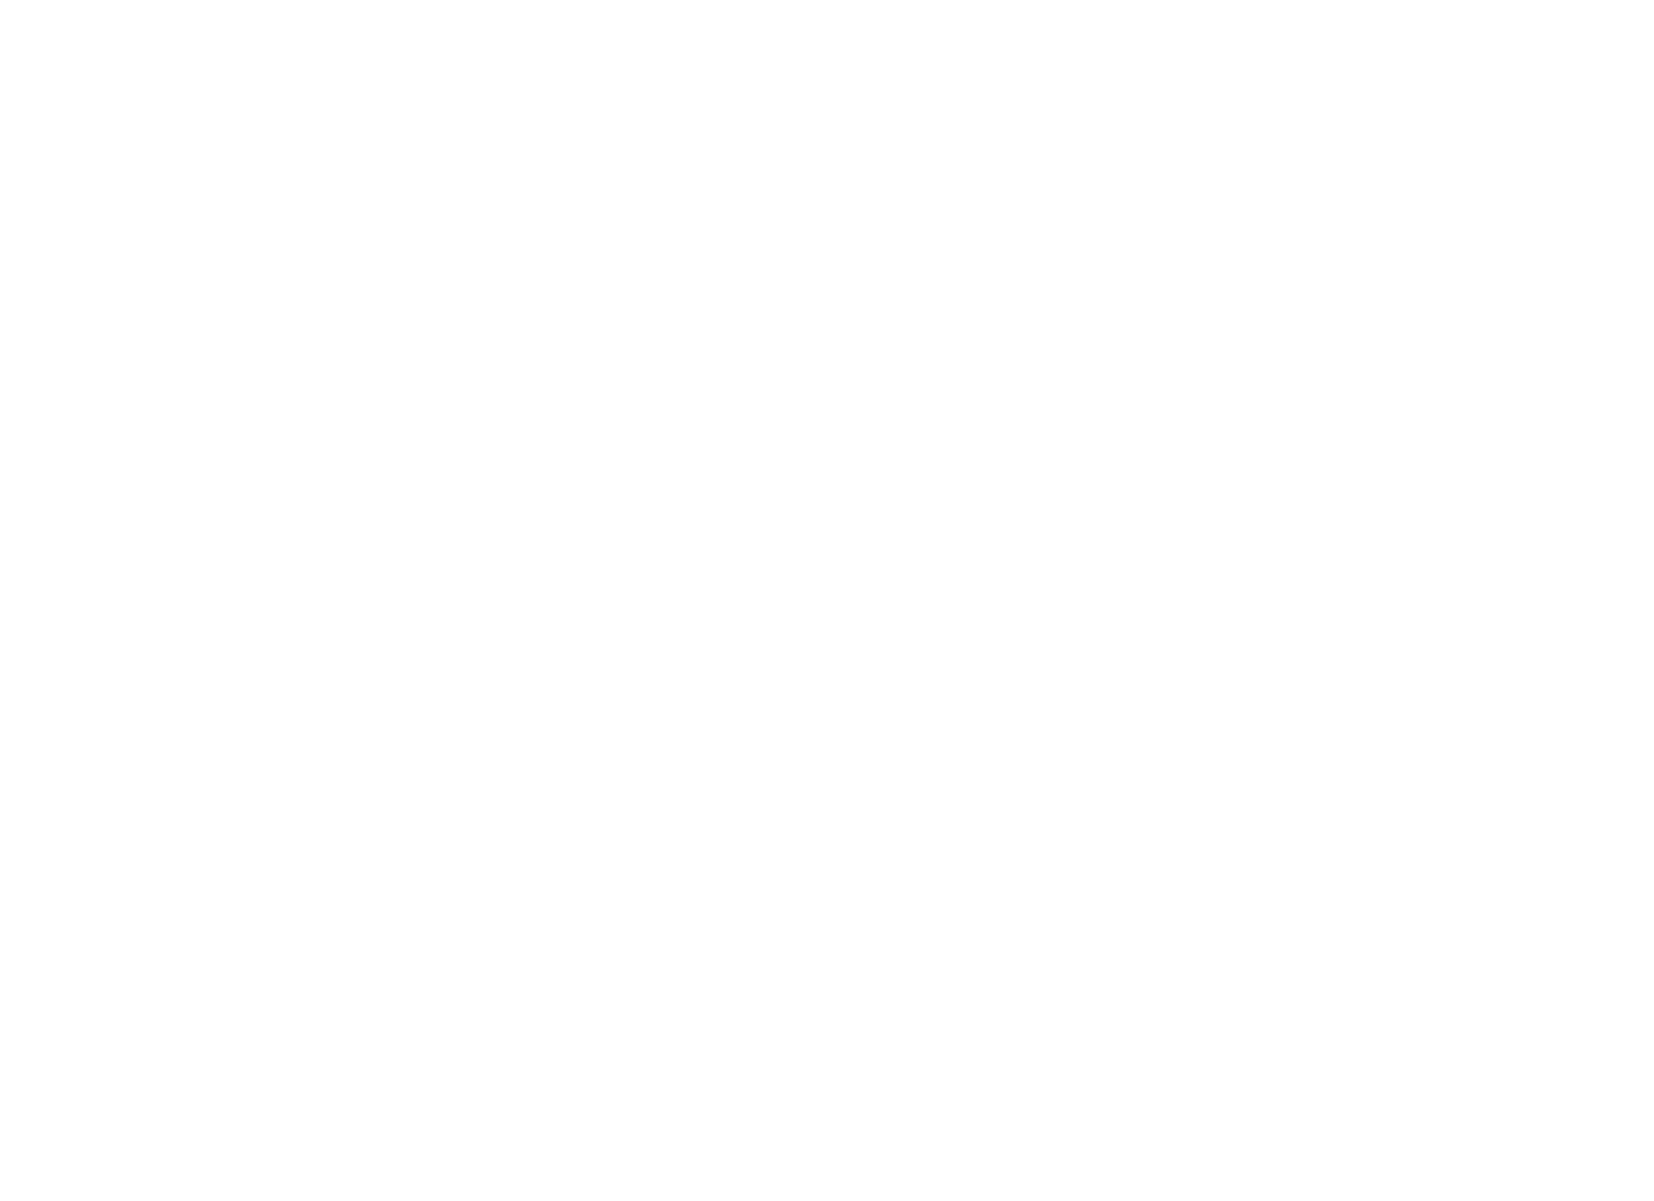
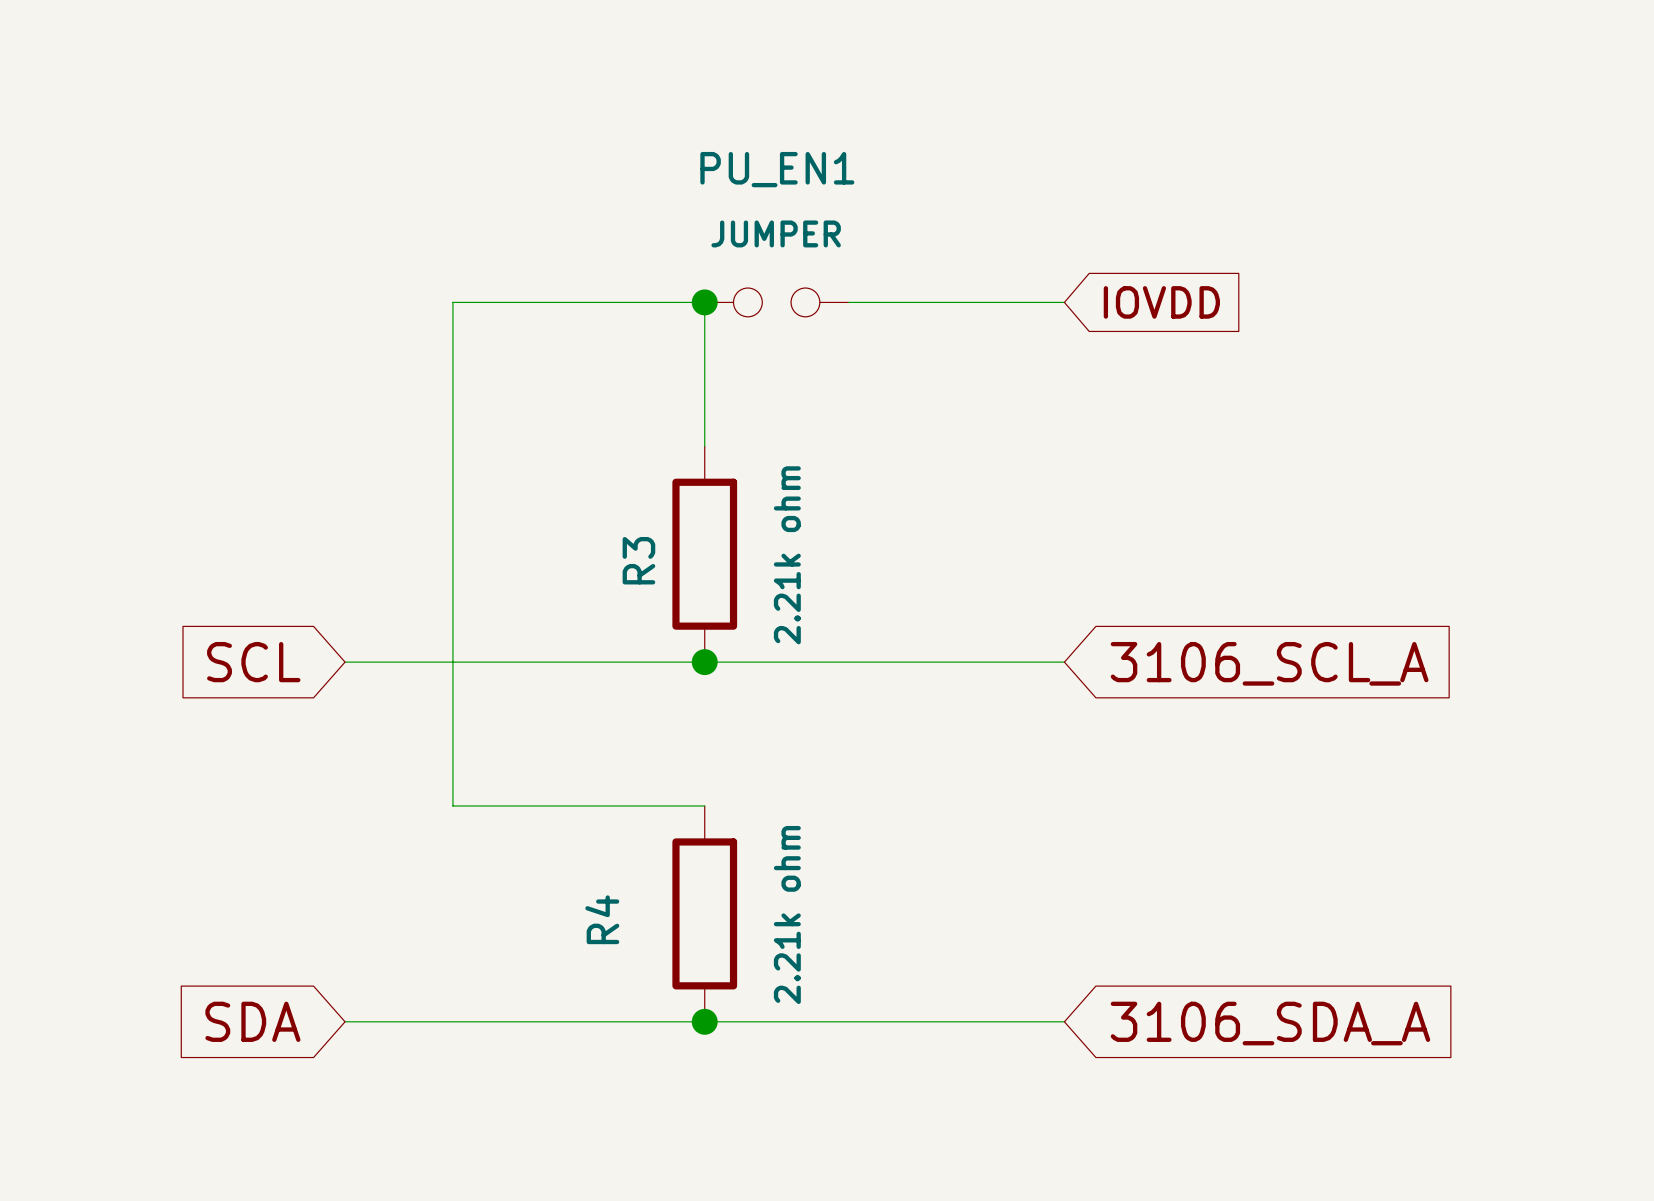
junction: none -> (704, 302)
PU_EN1: none -> JUMPER (776, 302)
wire: none -> (848, 302) (1064, 302)
global label: none -> IOVDD (1161, 302)
wire: none -> (704, 446) (704, 302) (452, 302) (452, 805) (704, 805)
R3: none -> 2.21k ohm (704, 554)
global label: none -> SCL (253, 662)
wire: none -> (345, 662) (1064, 662)
junction: none -> (704, 662)
global label: none -> 3106_SCL_A (1269, 663)
R4: none -> 2.21k ohm (704, 913)
global label: none -> SDA (252, 1021)
wire: none -> (345, 1021) (1064, 1021)
junction: none -> (704, 1021)
global label: none -> 3106_SDA_A (1270, 1023)

